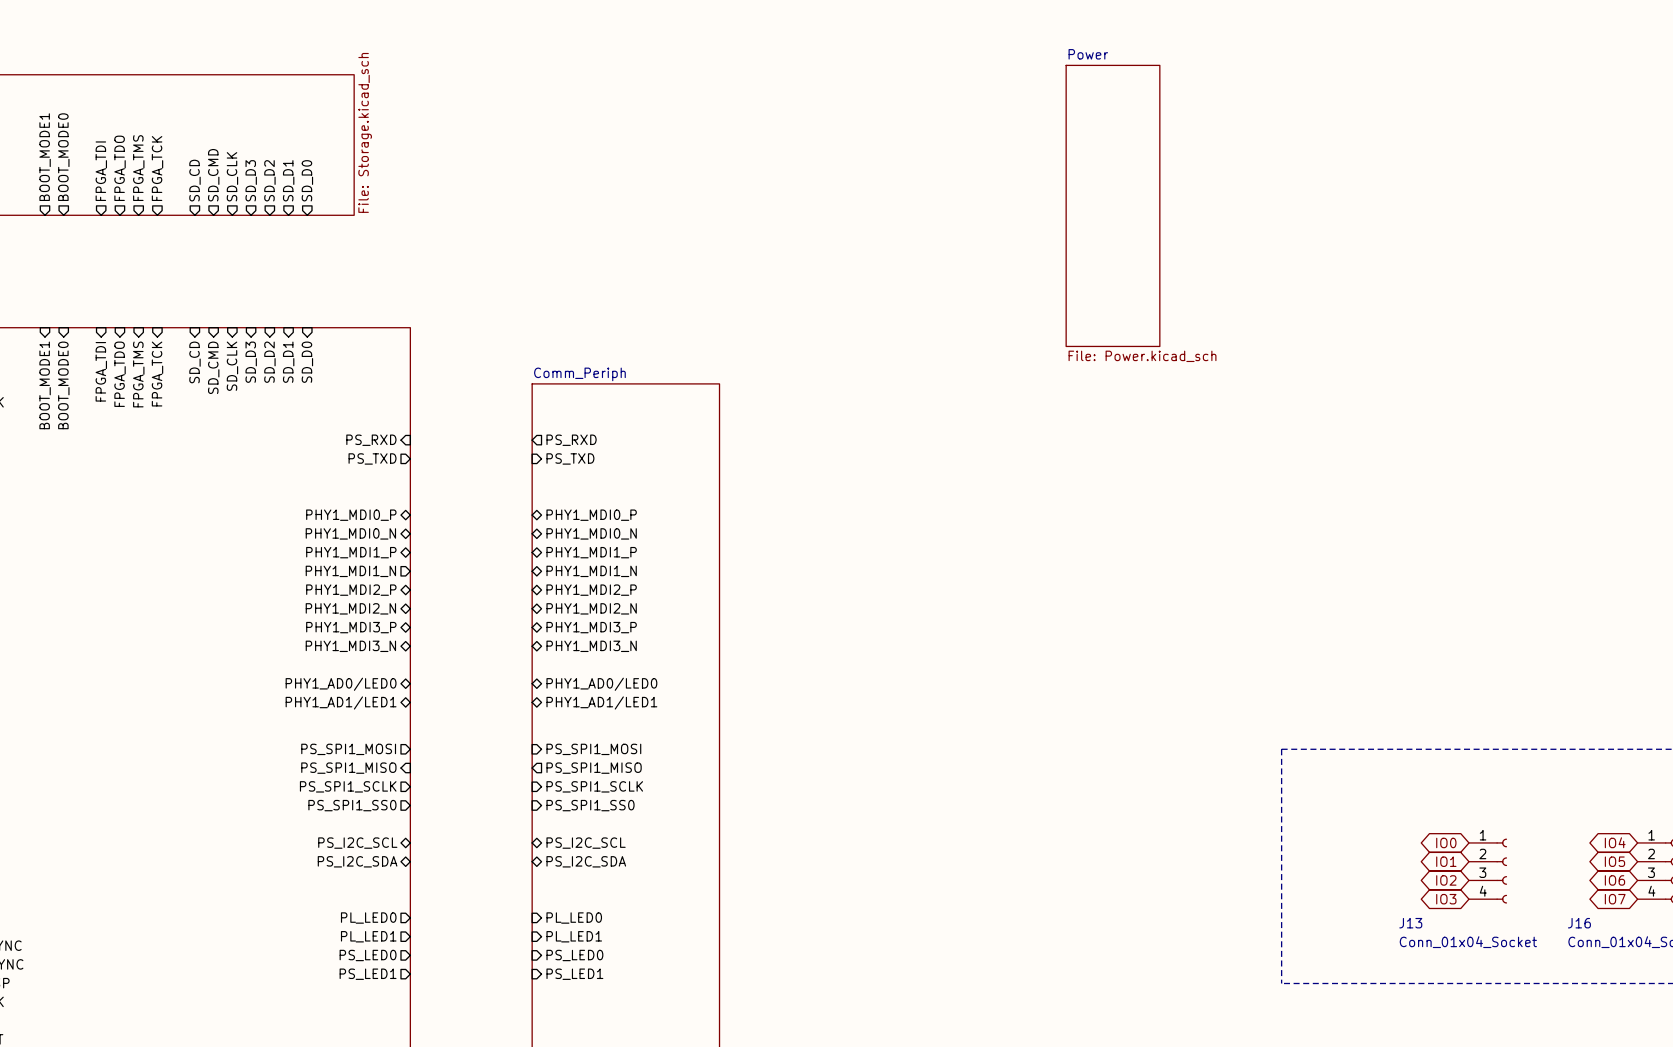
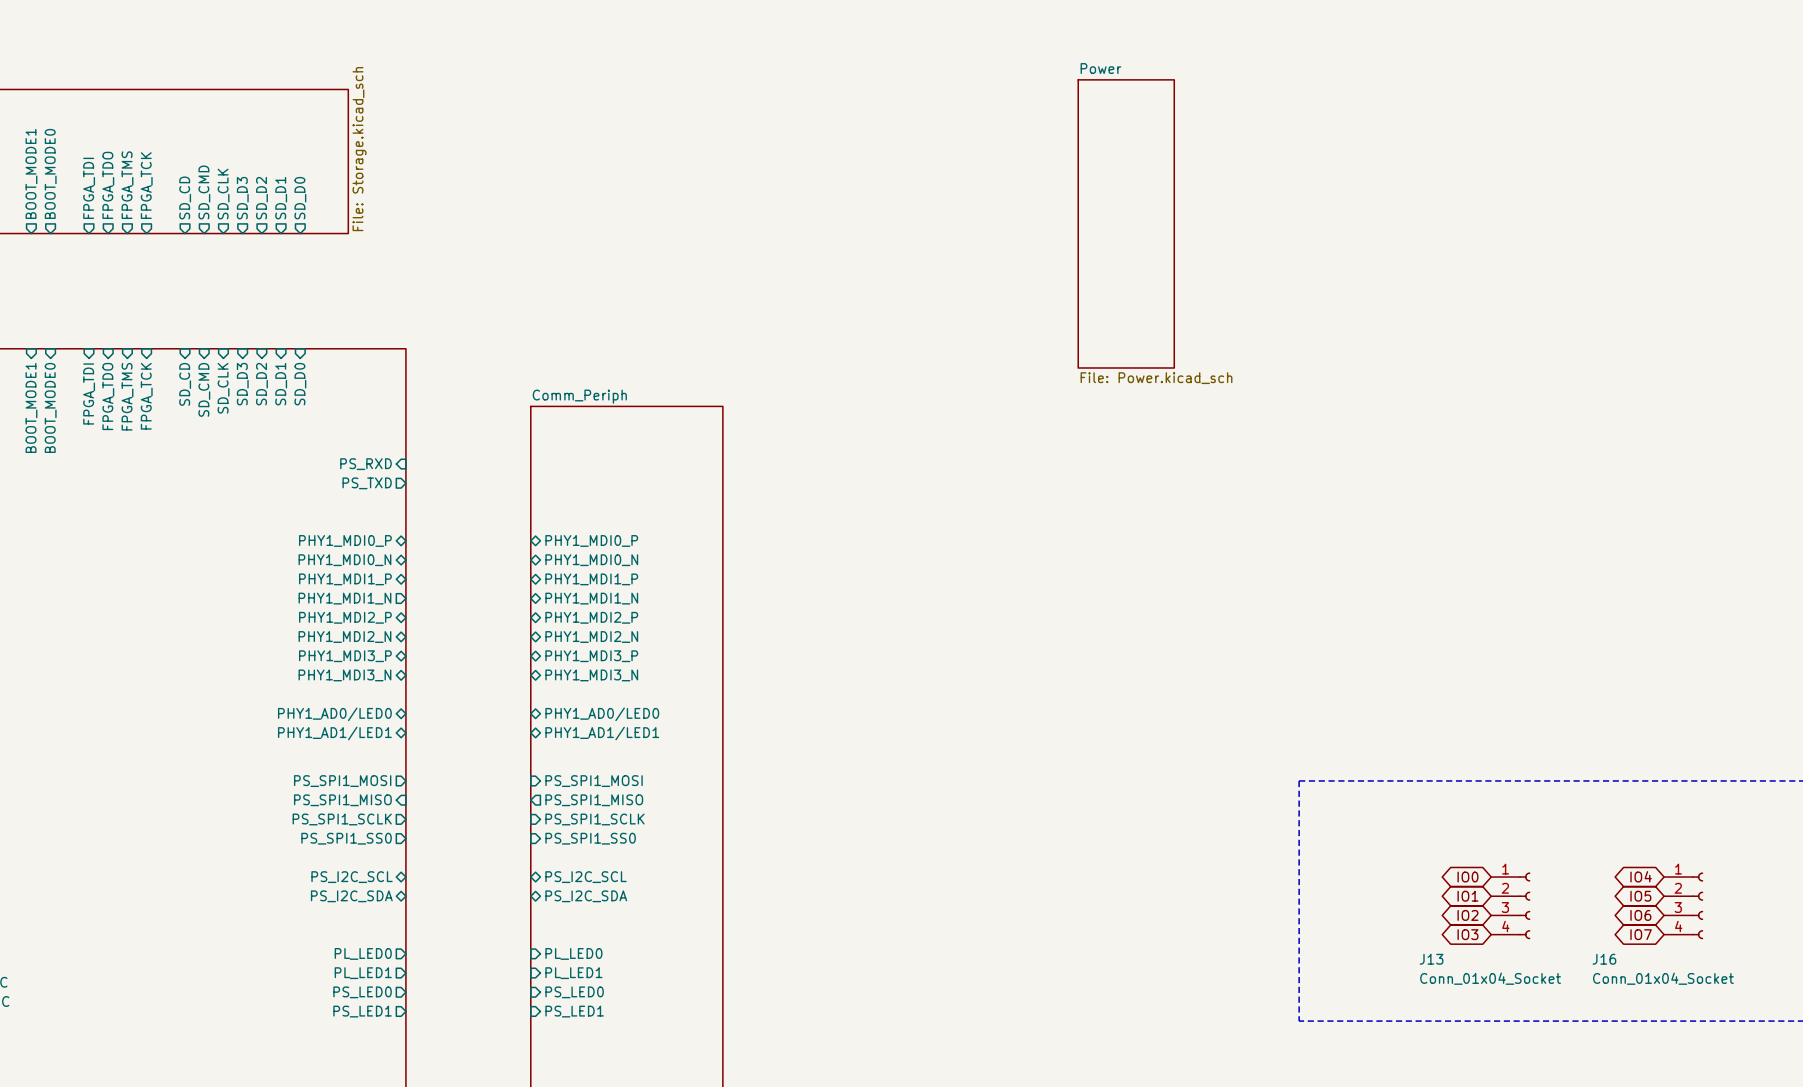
sheet pin: PS_RXD (571, 440) -> none
sheet pin: PS_TXD (570, 458) -> none

